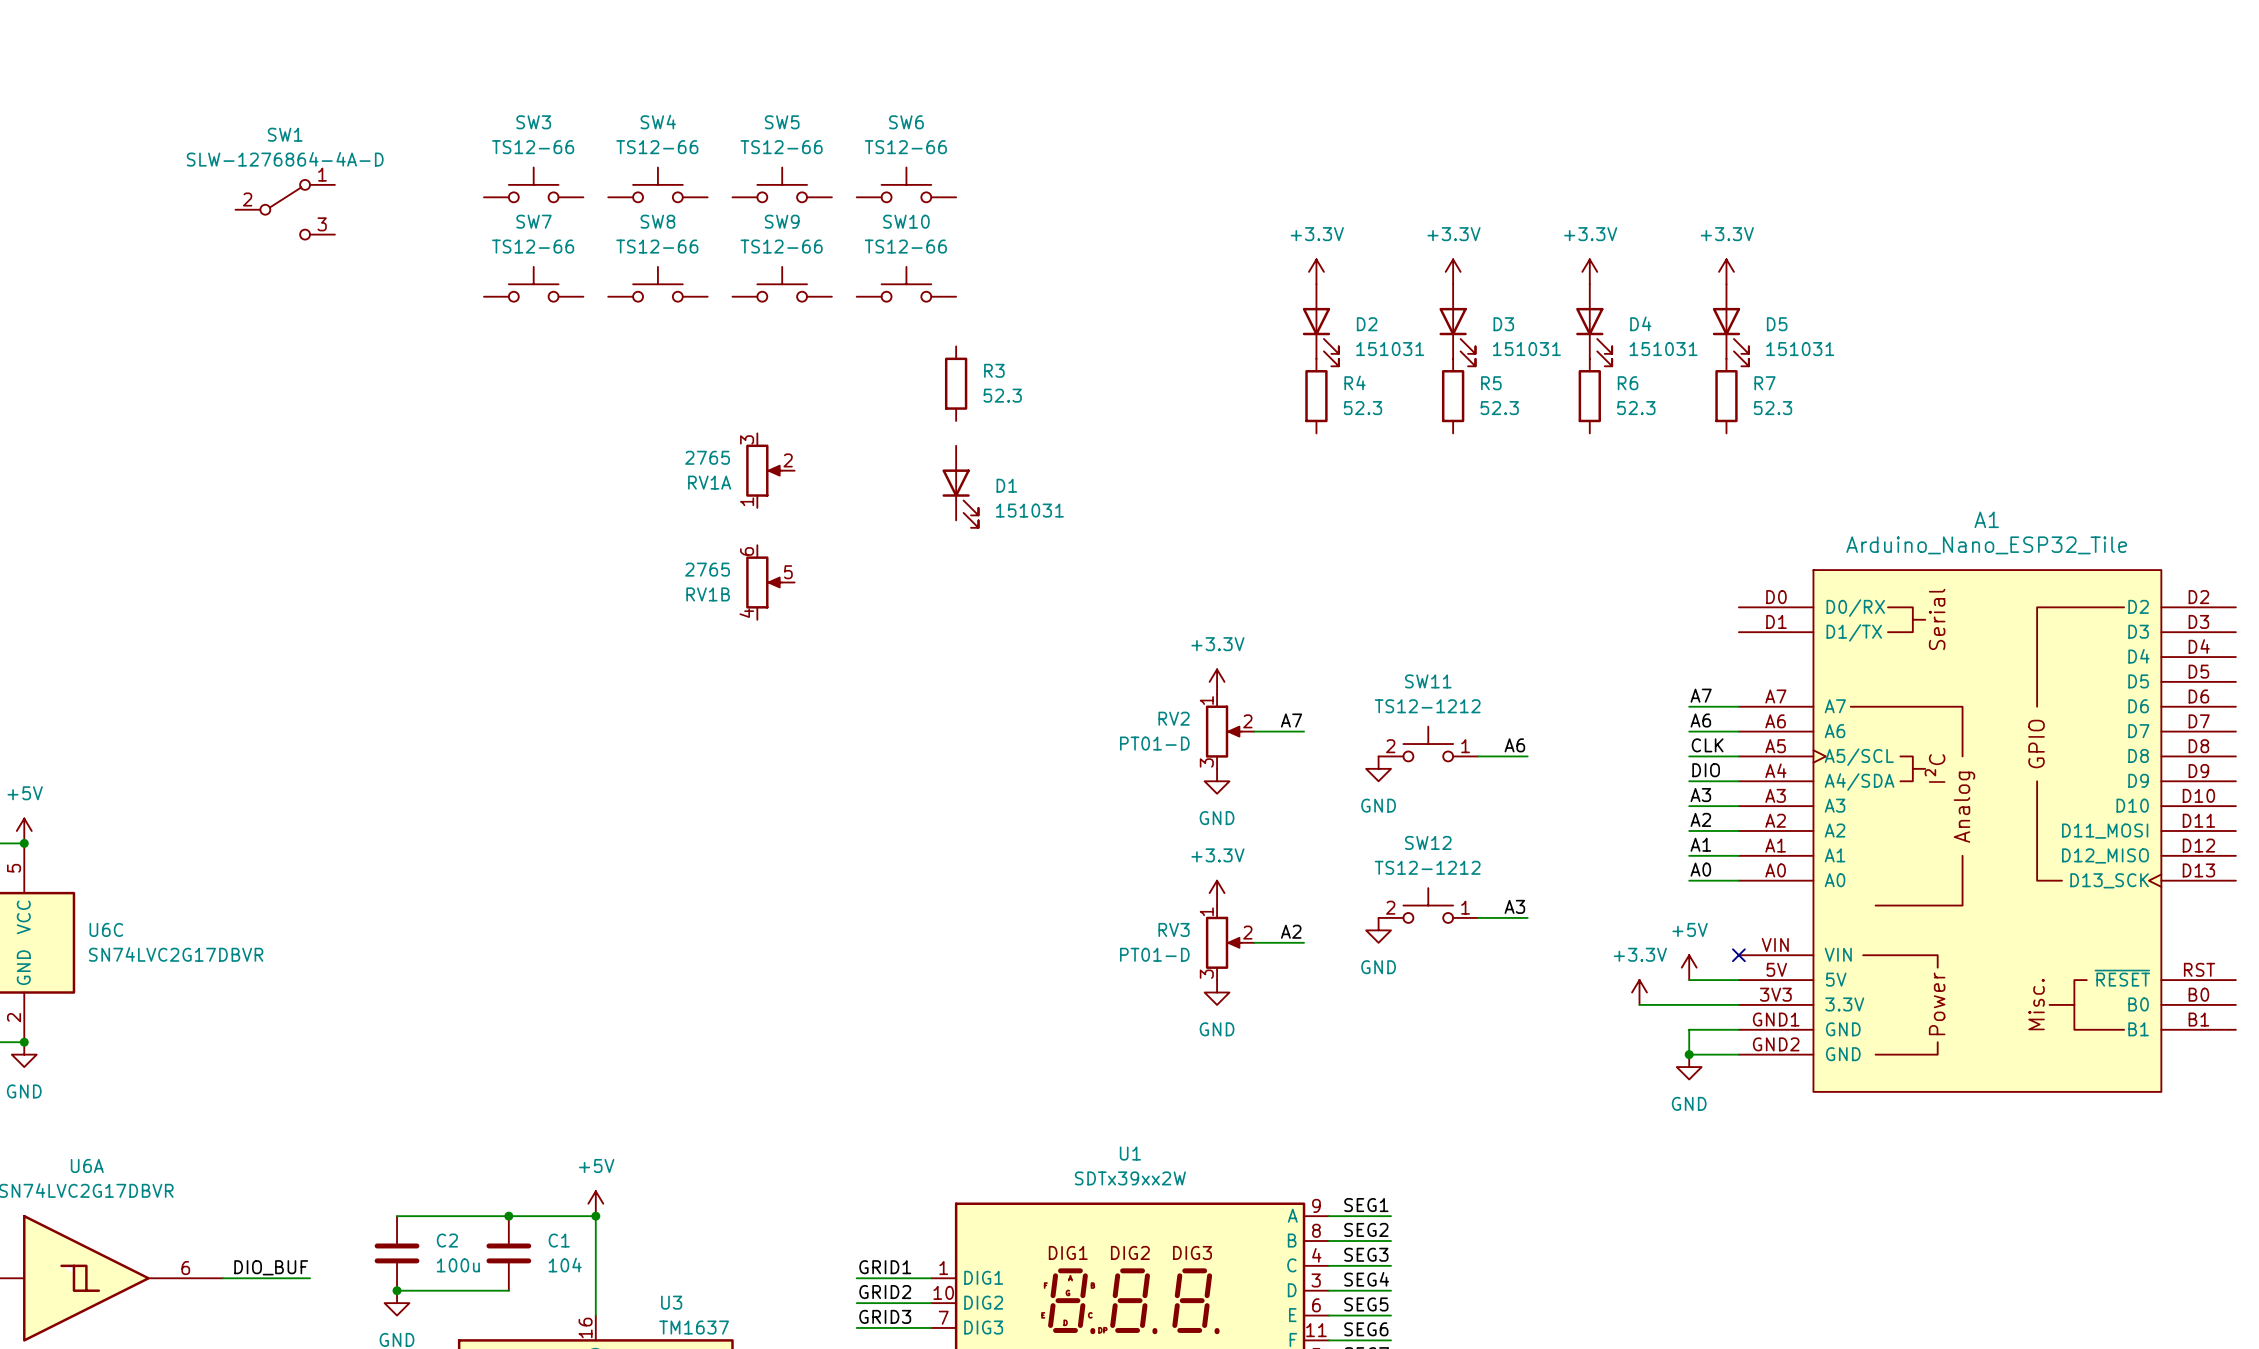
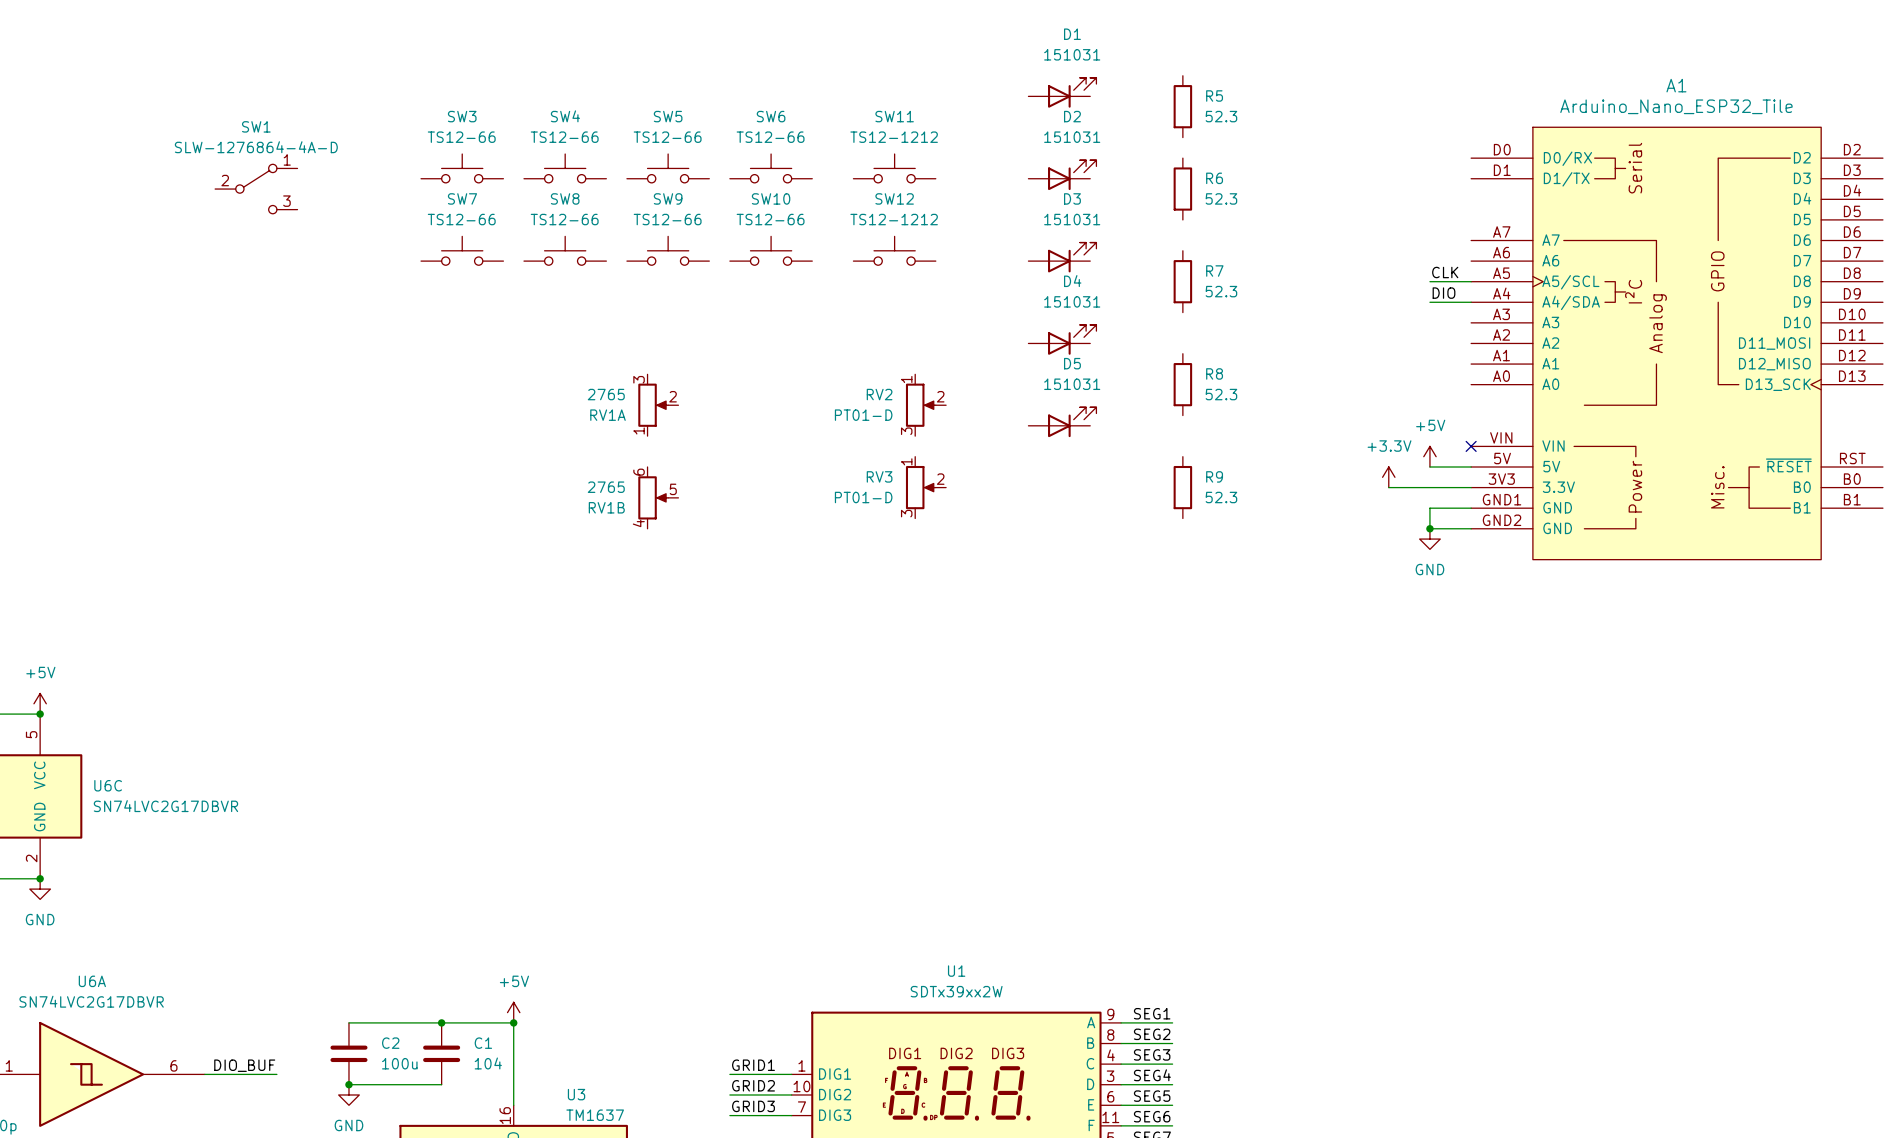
power symbol: +3.3V (1316, 271) -> none
power symbol: +3.3V (1453, 271) -> none
power symbol: +3.3V (1589, 271) -> none
power symbol: +3.3V (1726, 271) -> none
label: none -> CLK (1445, 272)
wire: none -> (1429, 281) (1471, 281)
D4 name position: D4 (1640, 323) -> D4 (1072, 281)
D2 name position: D2 (1367, 324) -> D2 (1072, 116)
D3 name position: D3 (1503, 324) -> D3 (1072, 198)
D5 name position: D5 (1777, 324) -> D5 (1072, 363)
D2 position: (1320, 325) -> (1062, 175)
D3 position: (1457, 325) -> (1062, 257)
D4 position: (1594, 325) -> (1062, 339)
D5 position: (1730, 325) -> (1062, 422)
label: none -> DIO (1444, 293)
D2 rotation: 0° (1320, 337) -> 90° counterclockwise (1072, 175)
D3 rotation: 0° (1457, 337) -> 90° counterclockwise (1072, 257)
D4 rotation: 0° (1594, 337) -> 90° counterclockwise (1072, 339)
D5 rotation: 0° (1730, 337) -> 90° counterclockwise (1072, 422)
wire: none -> (1429, 302) (1471, 302)
D2 value position: 151031 (1390, 349) -> 151031 (1072, 137)
D3 value position: 151031 (1526, 349) -> 151031 (1072, 219)
D4 value position: 151031 (1663, 349) -> 151031 (1072, 301)
D5 value position: 151031 (1800, 349) -> 151031 (1072, 384)
R3: 52.3 (956, 383) -> none
R4: 52.3 (1316, 396) -> none
R5 position: (1453, 396) -> (1182, 106)
R6 position: (1589, 396) -> (1182, 189)
R7 position: (1726, 396) -> (1182, 281)
R8: none -> 52.3 (1182, 384)
D1 name position: D1 (1006, 485) -> D1 (1072, 34)
D1 position: (960, 486) -> (1062, 92)
D1 rotation: 0° (960, 498) -> 90° counterclockwise (1072, 92)
D1 value position: 151031 (1029, 510) -> 151031 (1072, 54)
no-connect mark: none -> (1471, 446)
power symbol: none -> +5V (1429, 456)
power symbol: none -> +3.3V (1388, 477)
R9: none -> 52.3 (1182, 487)
wire: none -> (1388, 487) (1471, 487)
wire: none -> (1471, 508) (1429, 508) (1429, 528) (1471, 528)
junction: none -> (1429, 528)
power symbol: none -> GND (1429, 539)
power symbol: +3.3V (1217, 681) -> none
label: A7 (1701, 695) -> none
wire: (1689, 706) (1738, 706) -> (1429, 467) (1471, 467)
label: A7 (1291, 720) -> none
label: A6 (1700, 720) -> none
RV2 position: (1230, 731) -> (926, 405)
wire: (1254, 731) (1304, 731) -> none
wire: (1689, 731) (1738, 731) -> none
SW11 position: (1428, 744) -> (894, 168)
label: A6 (1514, 745) -> none
label: CLK (1707, 745) -> none
SW11 pin number: 2 (1390, 746) -> none
SW11 pin number: 1 (1465, 746) -> none
wire: (1477, 756) (1527, 756) -> none
wire: (1689, 756) (1738, 756) -> none
power symbol: GND (1378, 768) -> none
label: DIO (1706, 770) -> none
power symbol: GND (1217, 781) -> none
wire: (1689, 781) (1738, 781) -> none
label: A3 (1700, 795) -> none
wire: (1689, 806) (1738, 806) -> none
label: A2 (1700, 819) -> none
wire: (1689, 830) (1738, 830) -> none
A1 position: (1987, 830) -> (1677, 343)
label: A1 (1700, 844) -> none
wire: (1689, 855) (1738, 855) -> none
label: A0 (1700, 869) -> none
wire: (1689, 880) (1738, 880) -> none
power symbol: +3.3V (1217, 893) -> none
SW12 position: (1428, 905) -> (894, 250)
label: A3 (1514, 906) -> none
SW12 pin number: 2 (1390, 907) -> none
SW12 pin number: 1 (1465, 907) -> none
wire: (1477, 917) (1527, 917) -> none
power symbol: GND (1378, 930) -> none
label: A2 (1291, 931) -> none
RV3 position: (1230, 942) -> (926, 487)
wire: (1254, 942) (1304, 942) -> none
no-connect mark: (1738, 955) -> none
power symbol: +5V (1689, 967) -> none
wire: (1689, 980) (1738, 980) -> none
power symbol: GND (1217, 992) -> none
power symbol: +3.3V (1639, 992) -> none
wire: (1639, 1004) (1738, 1004) -> none
wire: (1738, 1029) (1689, 1029) (1689, 1054) (1738, 1054) -> none
junction: (1689, 1054) -> none
power symbol: GND (1689, 1067) -> none

